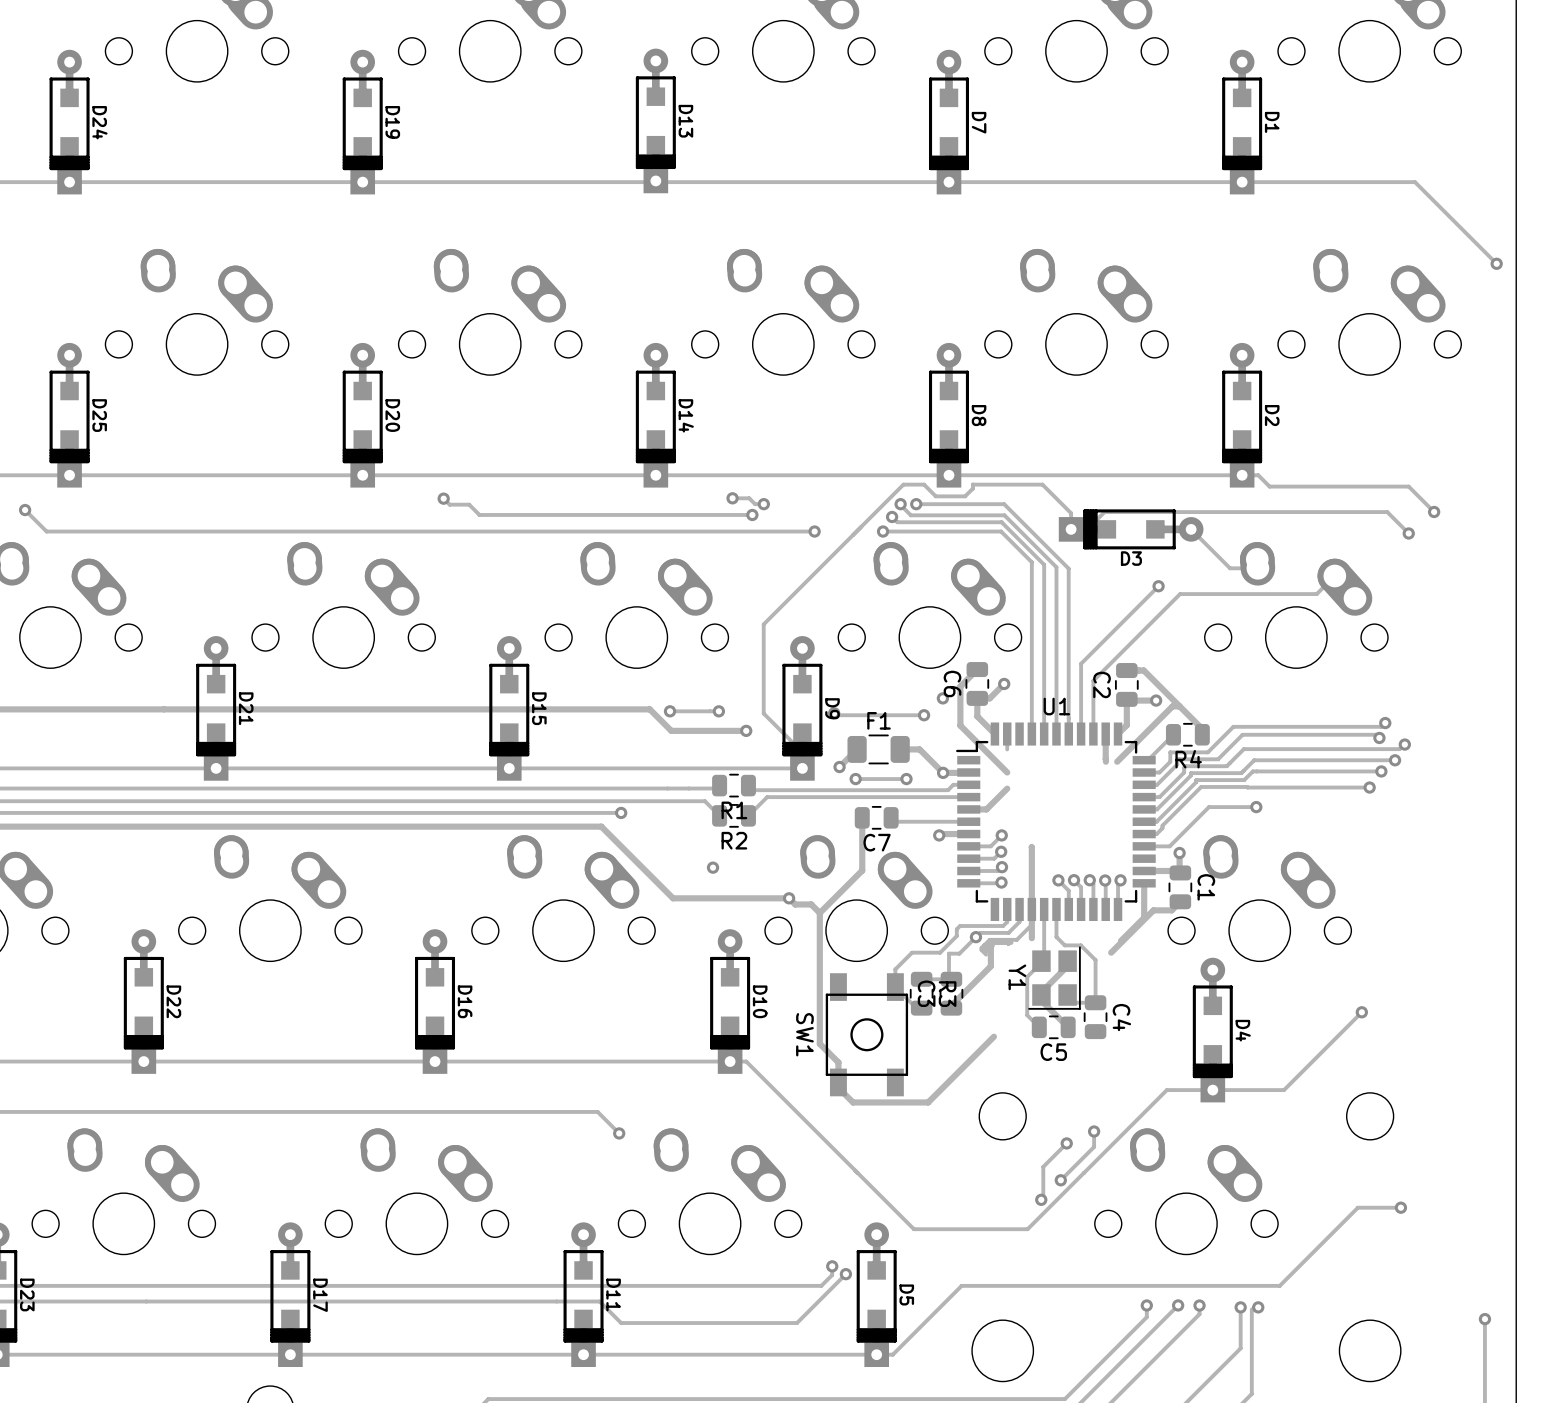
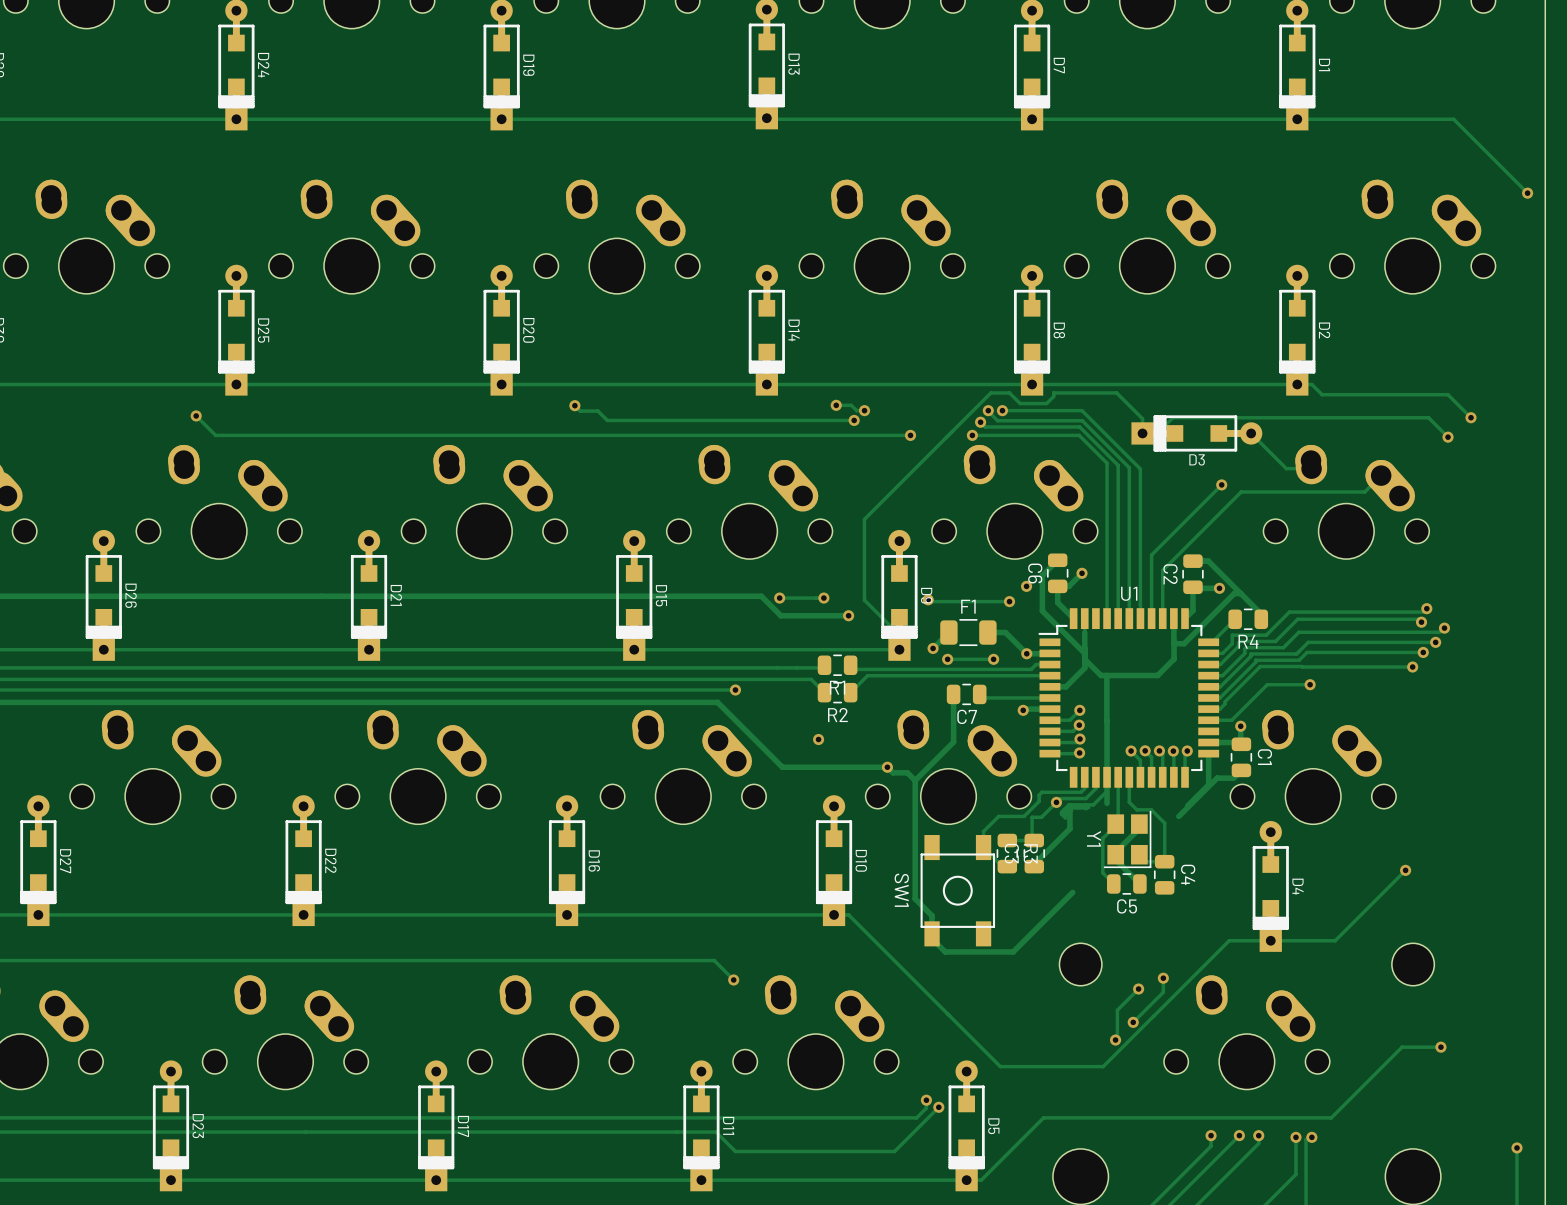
track: none -> (1084, 632) (1084, 668)
track: none -> (1184, 643) (1174, 643) (1174, 659) (1157, 675) (1100, 675) (1084, 659)
track: none -> (1106, 675) (1106, 720)

